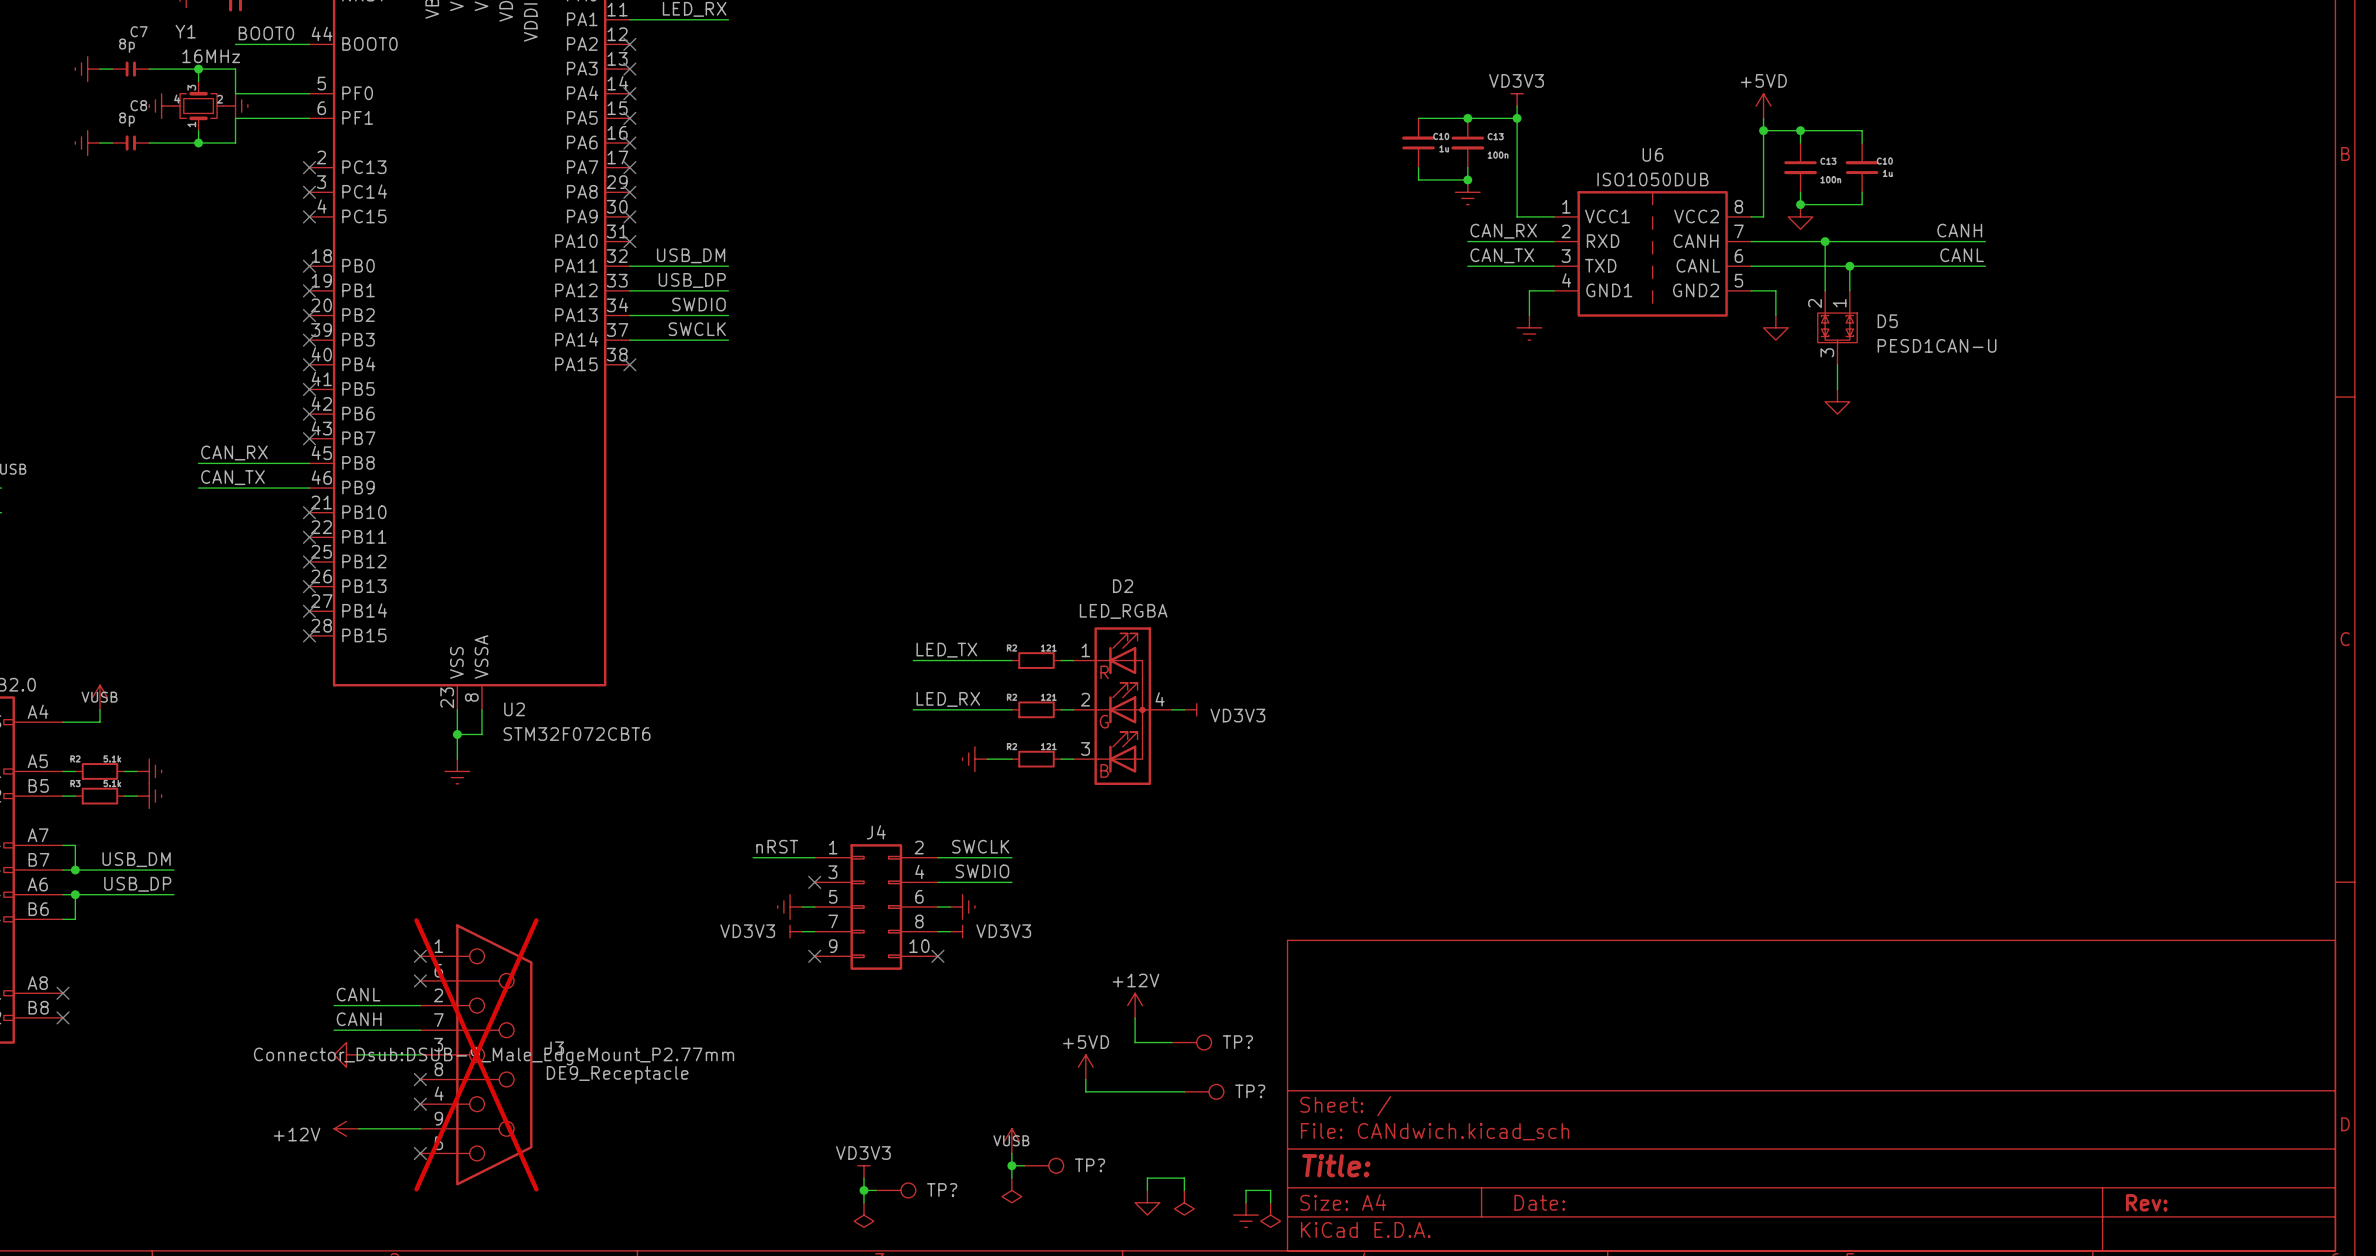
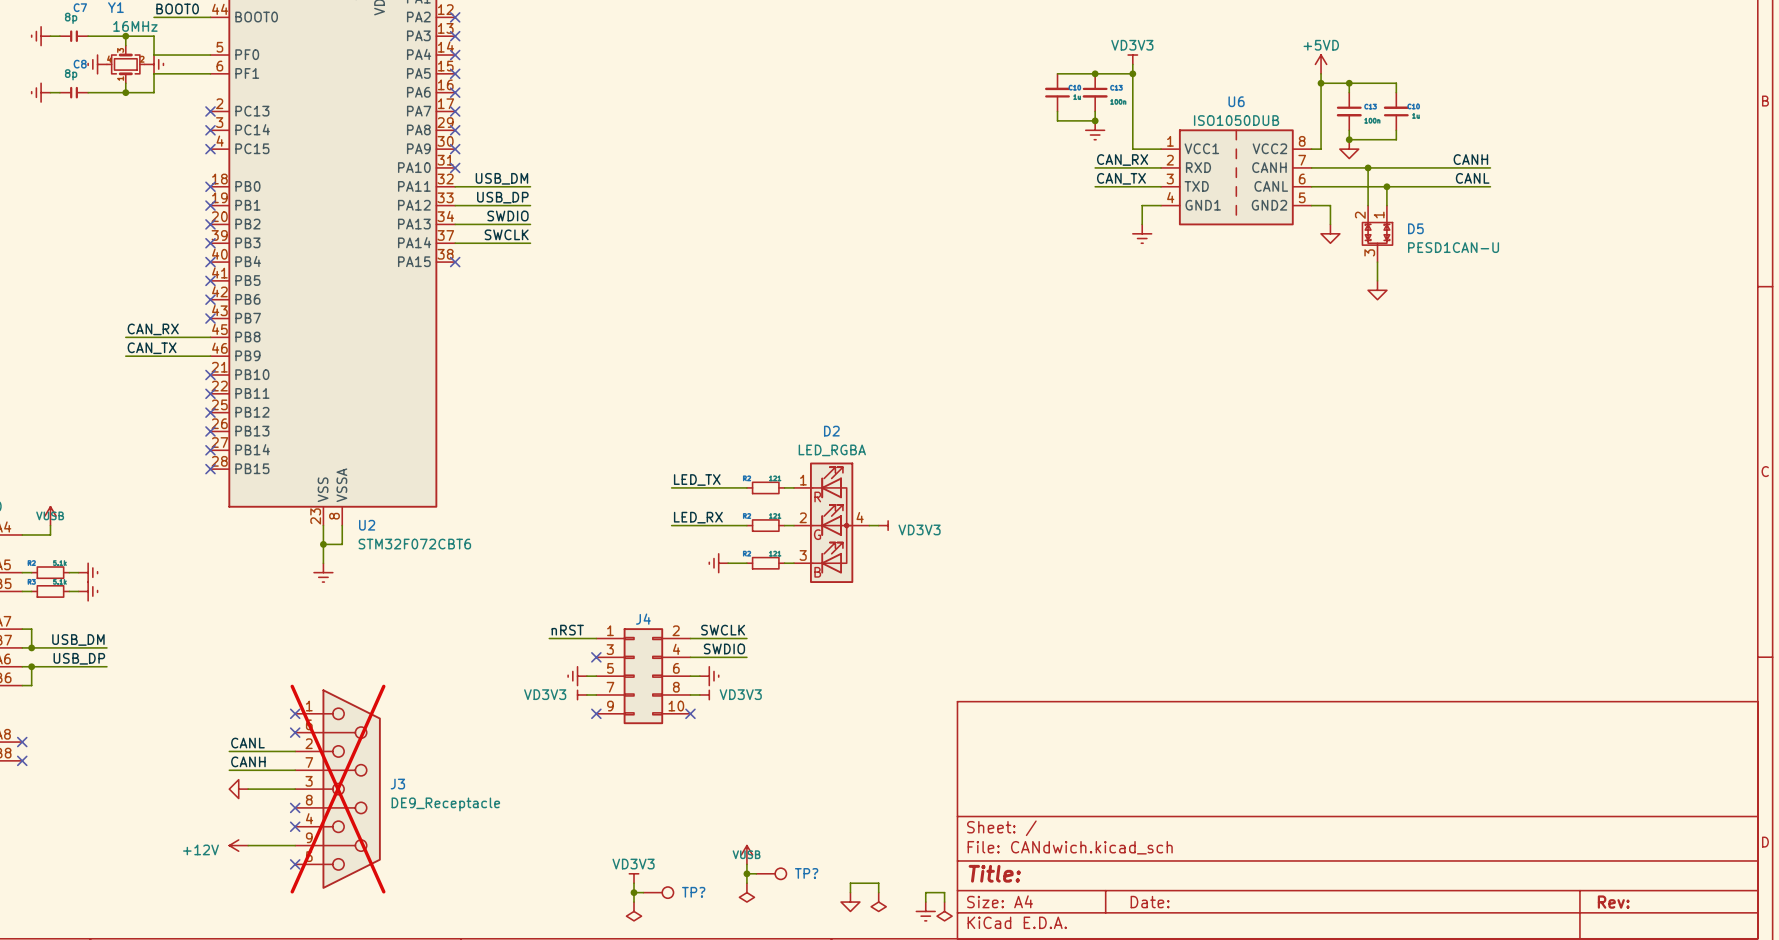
power symbol: +12V (1135, 1005) -> none
wire: (1135, 1017) (1135, 1042) (1172, 1042) -> none
TP?: (1191, 1042) -> none
J3 text: Connector_Dsub:DSUB-9_Male_EdgeMount_P2.77mm (494, 1056) -> none
power symbol: +5VD (1085, 1067) -> none
wire: (1085, 1079) (1085, 1091) (1184, 1091) -> none
TP?: (1204, 1091) -> none

